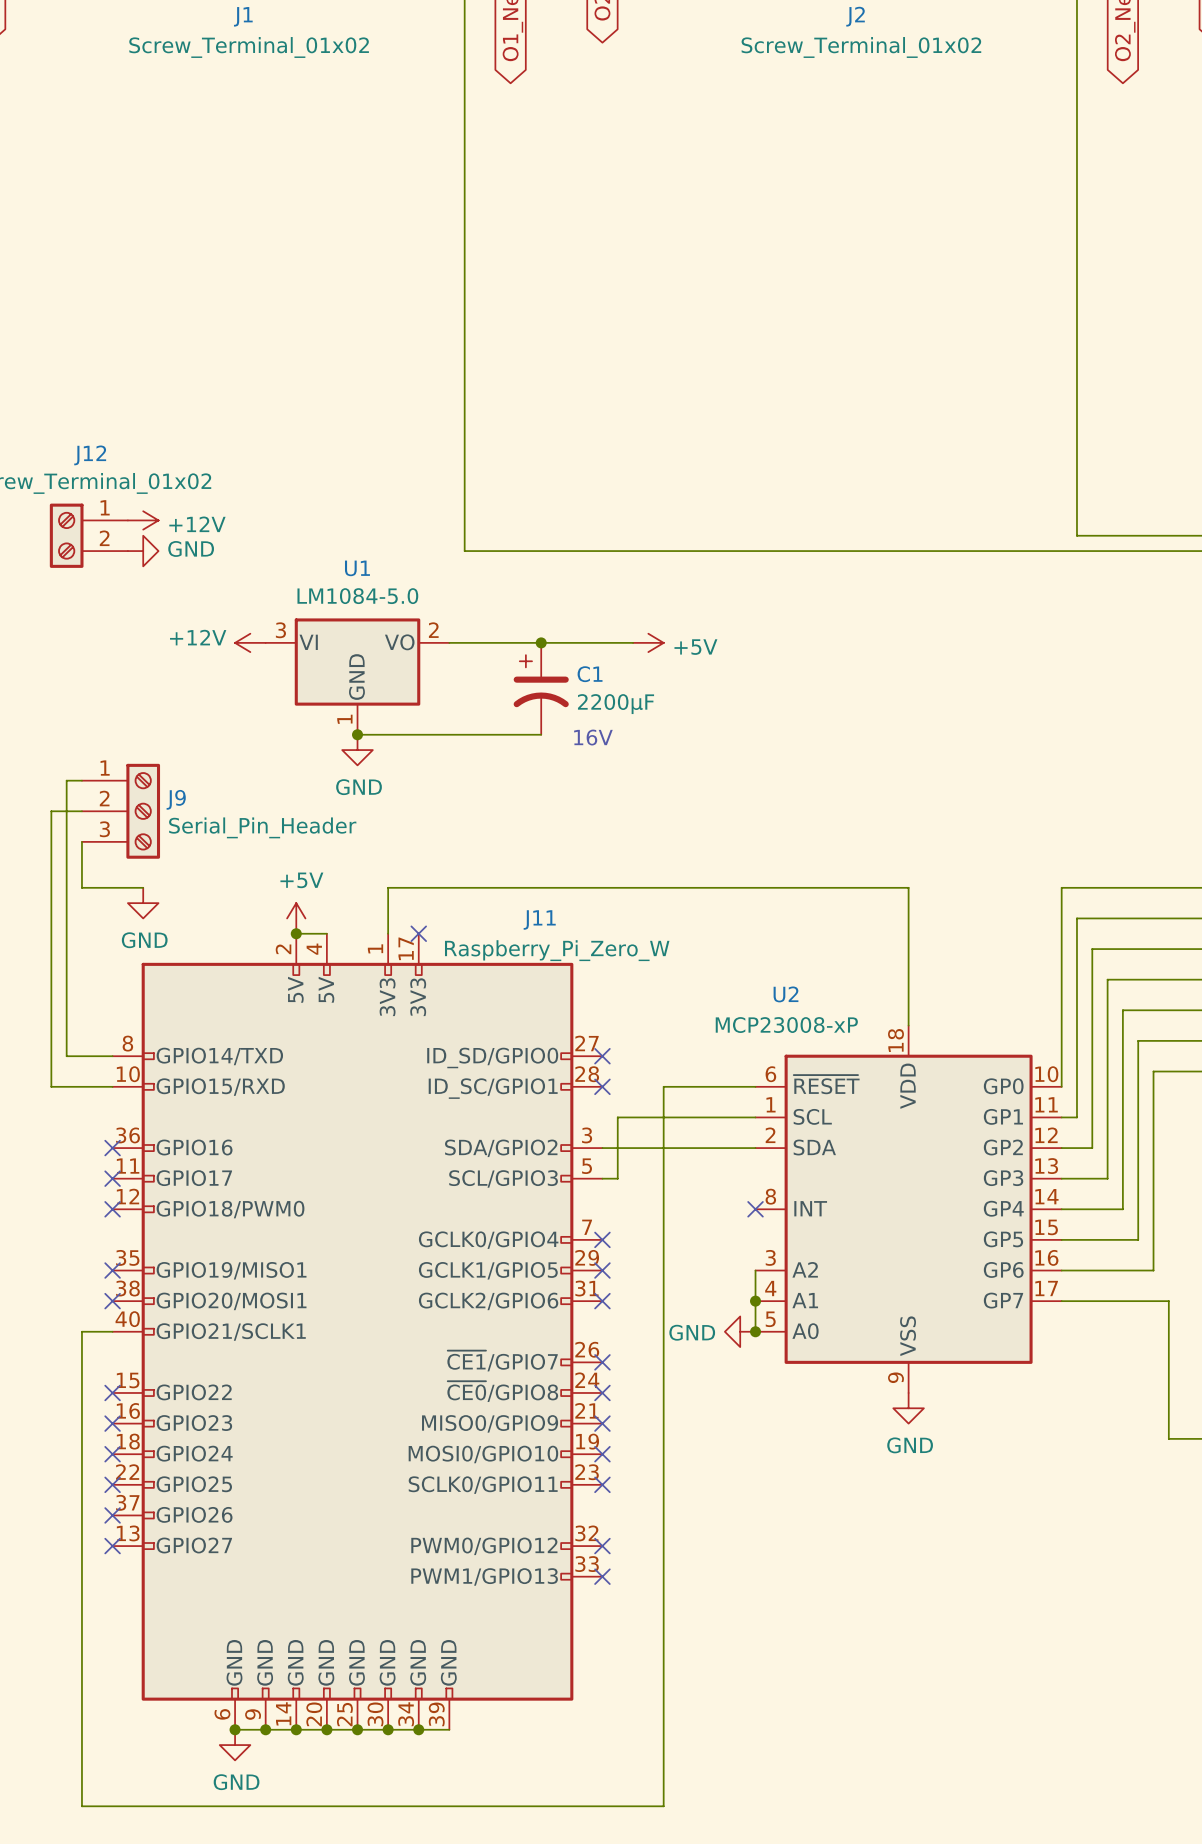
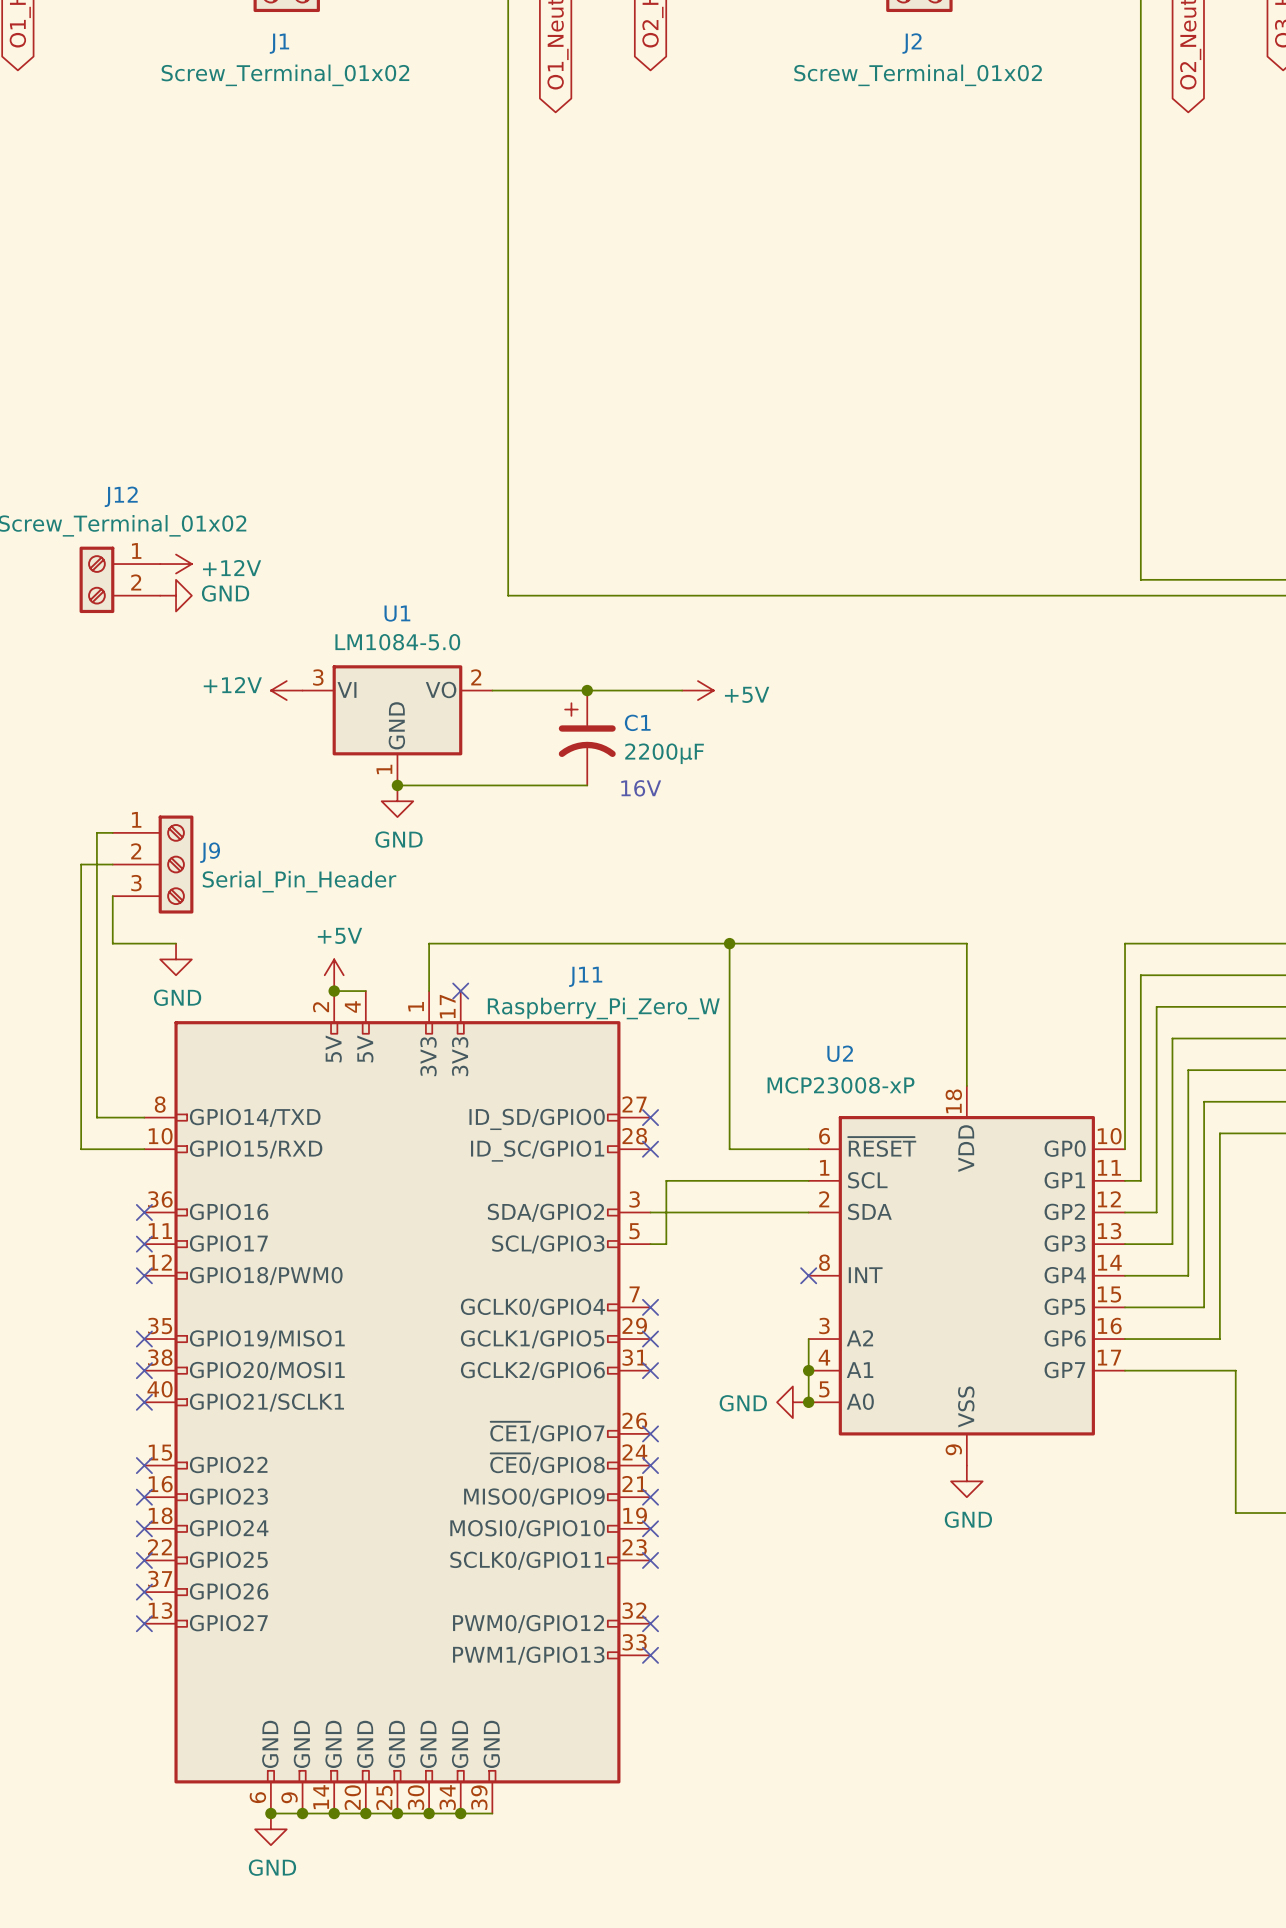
junction: none -> (729, 943)
wire: (678, 1086) (663, 1086) (663, 1806) (81, 1806) (81, 1331) (112, 1331) -> (729, 1149) (729, 943)
no-connect mark: none -> (144, 1402)

